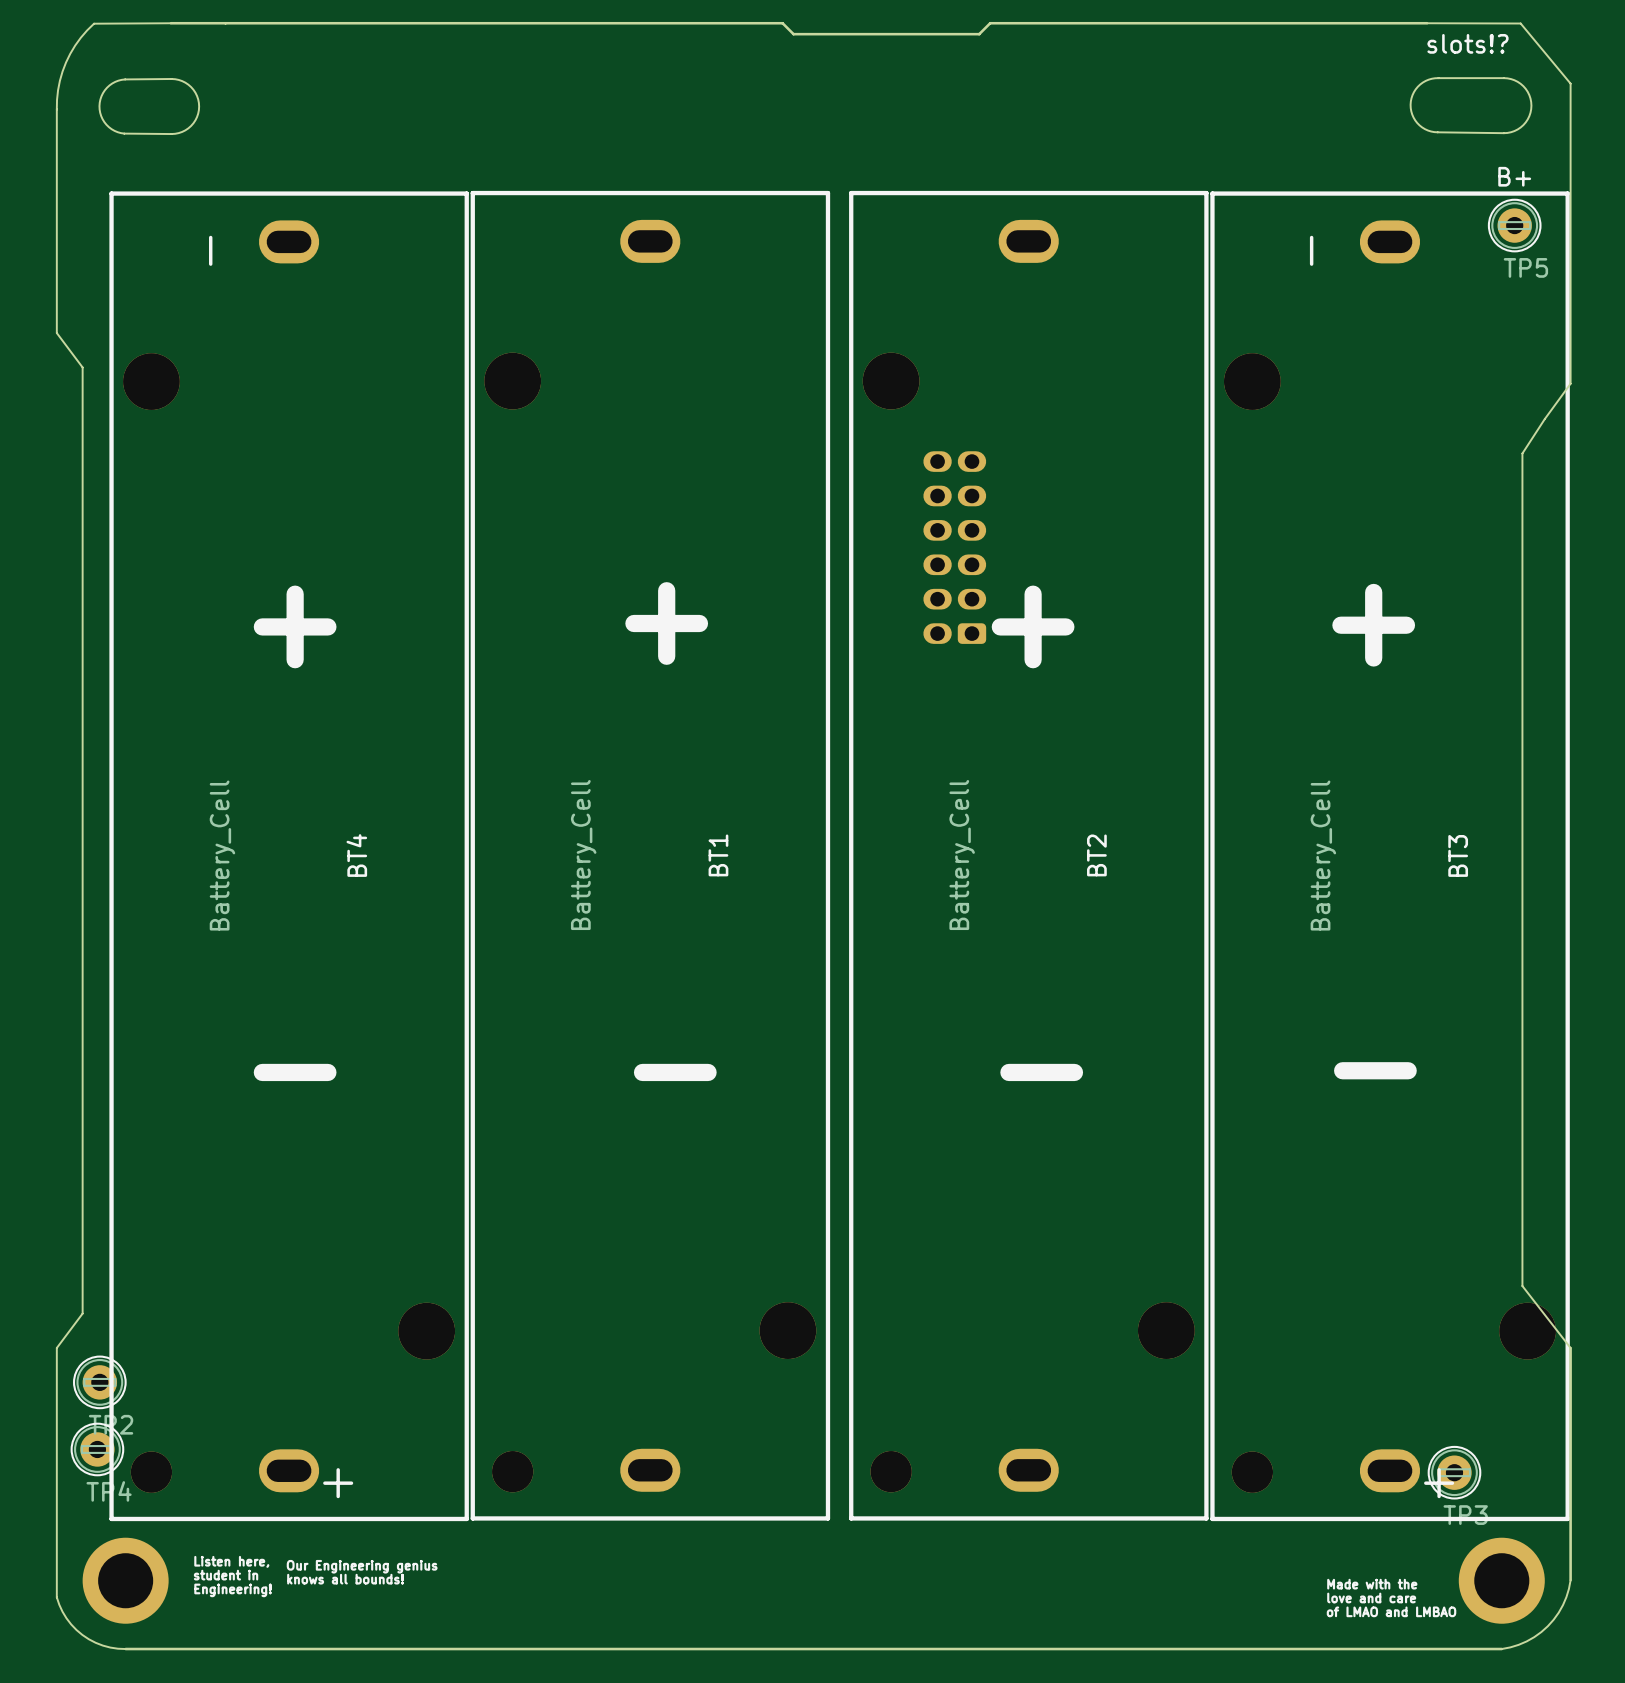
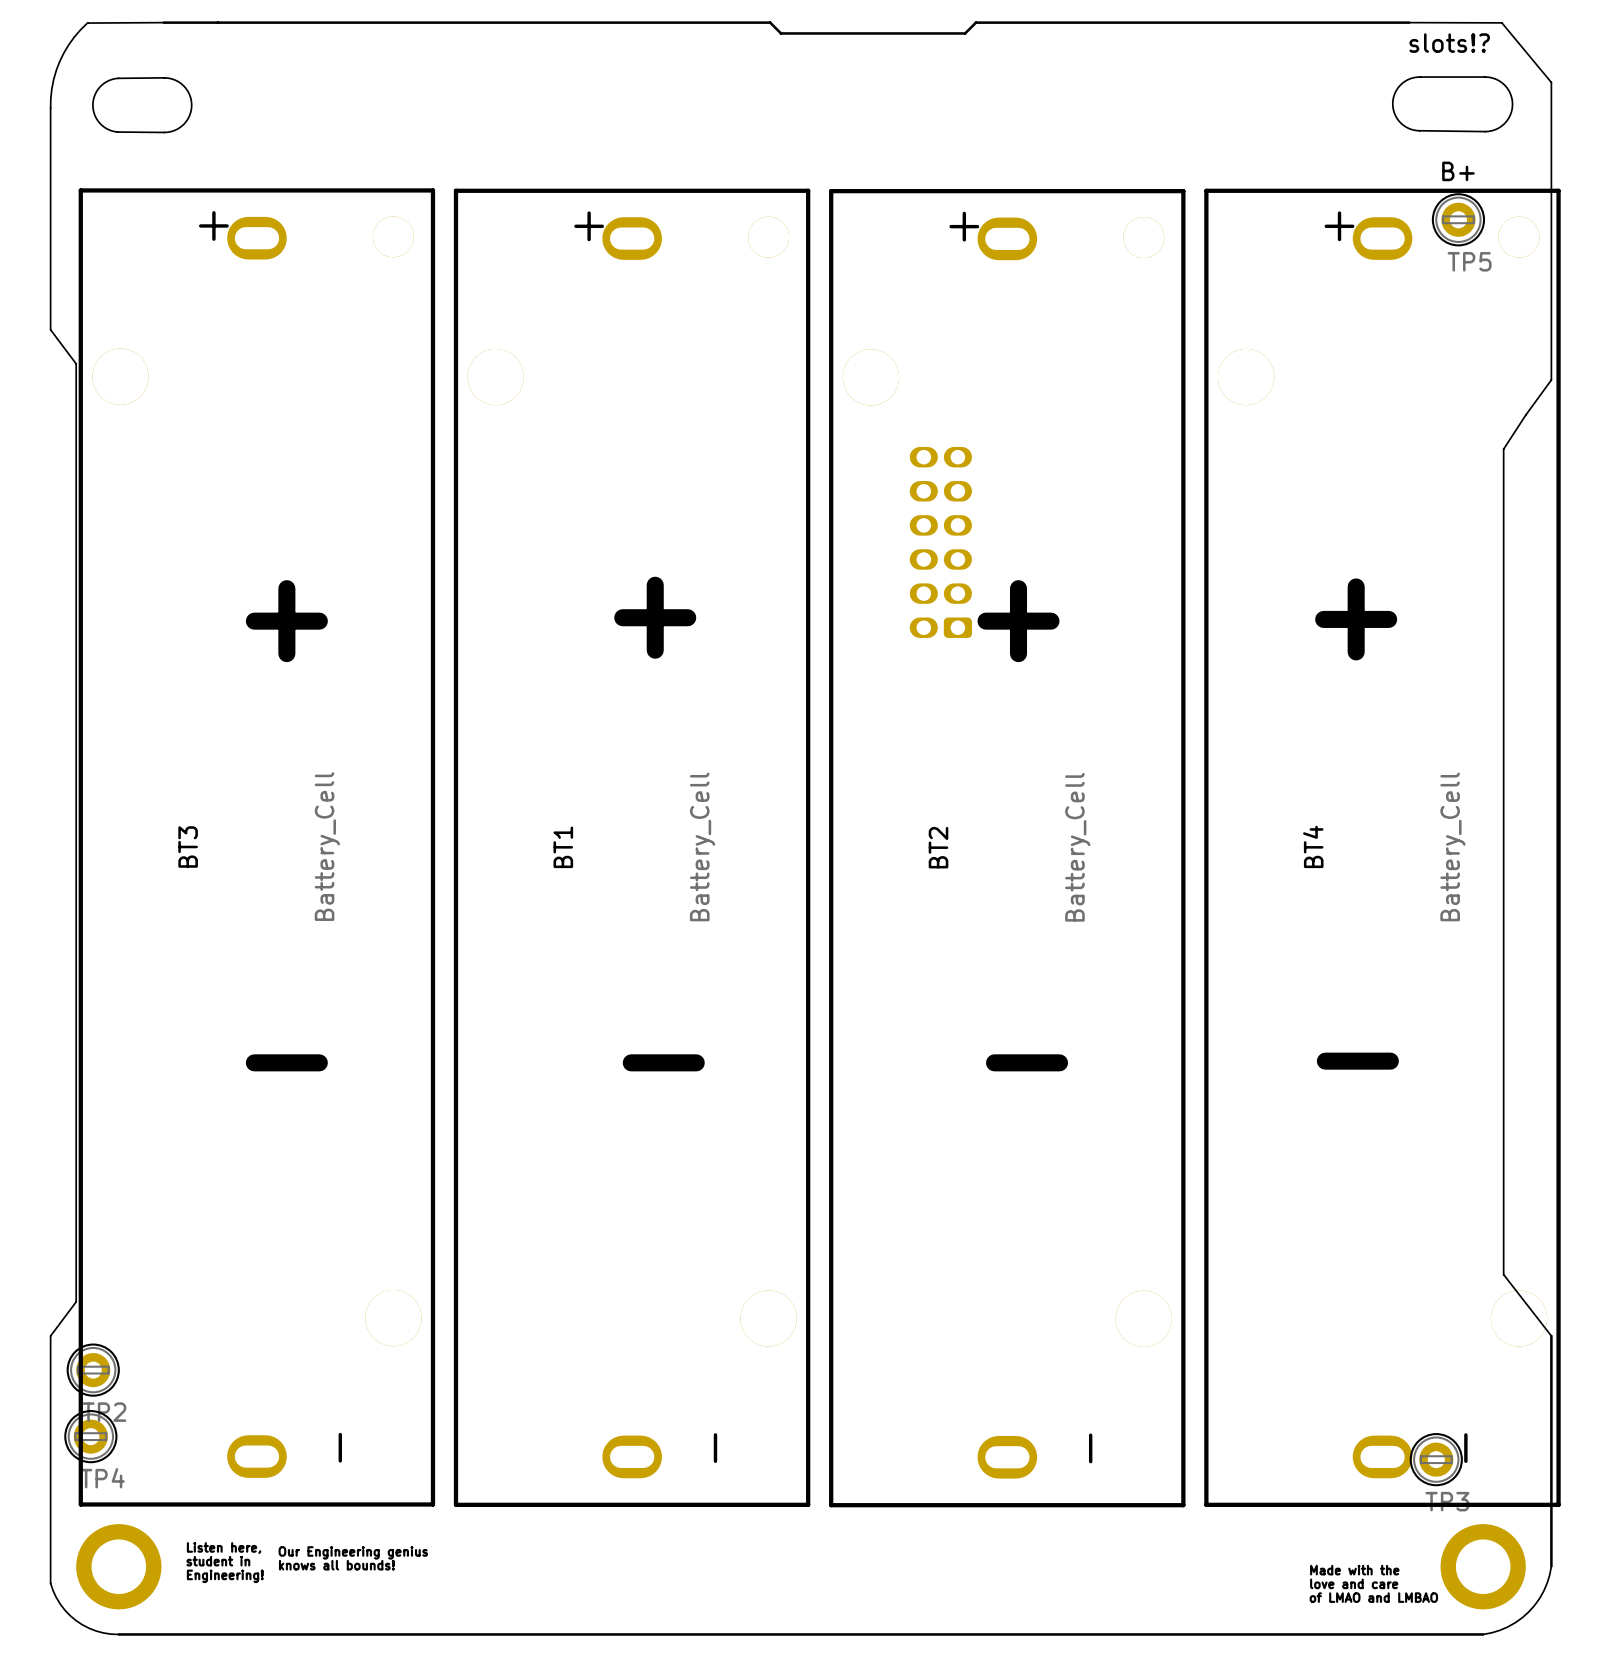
BT1 footprint: [470, 190, 831, 1521] -> [453, 188, 811, 1507]
BT2 footprint: [849, 190, 1209, 1521] -> [829, 189, 1186, 1508]
TP5 position: (1514, 225) -> (1458, 219)
BT1 value position: Battery_Cell (583, 855) -> Battery_Cell (702, 846)
BT1 name position: BT1 (718, 855) -> BT1 (563, 847)
BT2 value position: Battery_Cell (962, 855) -> Battery_Cell (1077, 847)
BT2 name position: BT2 (1096, 855) -> BT2 (938, 847)
BT4 rotation: 0° (289, 856) -> 180° (1382, 847)
BT4 position: (289, 856) -> (1382, 847)
BT3 rotation: 0° (1390, 856) -> 180° (256, 847)
BT3 position: (1390, 856) -> (256, 847)

